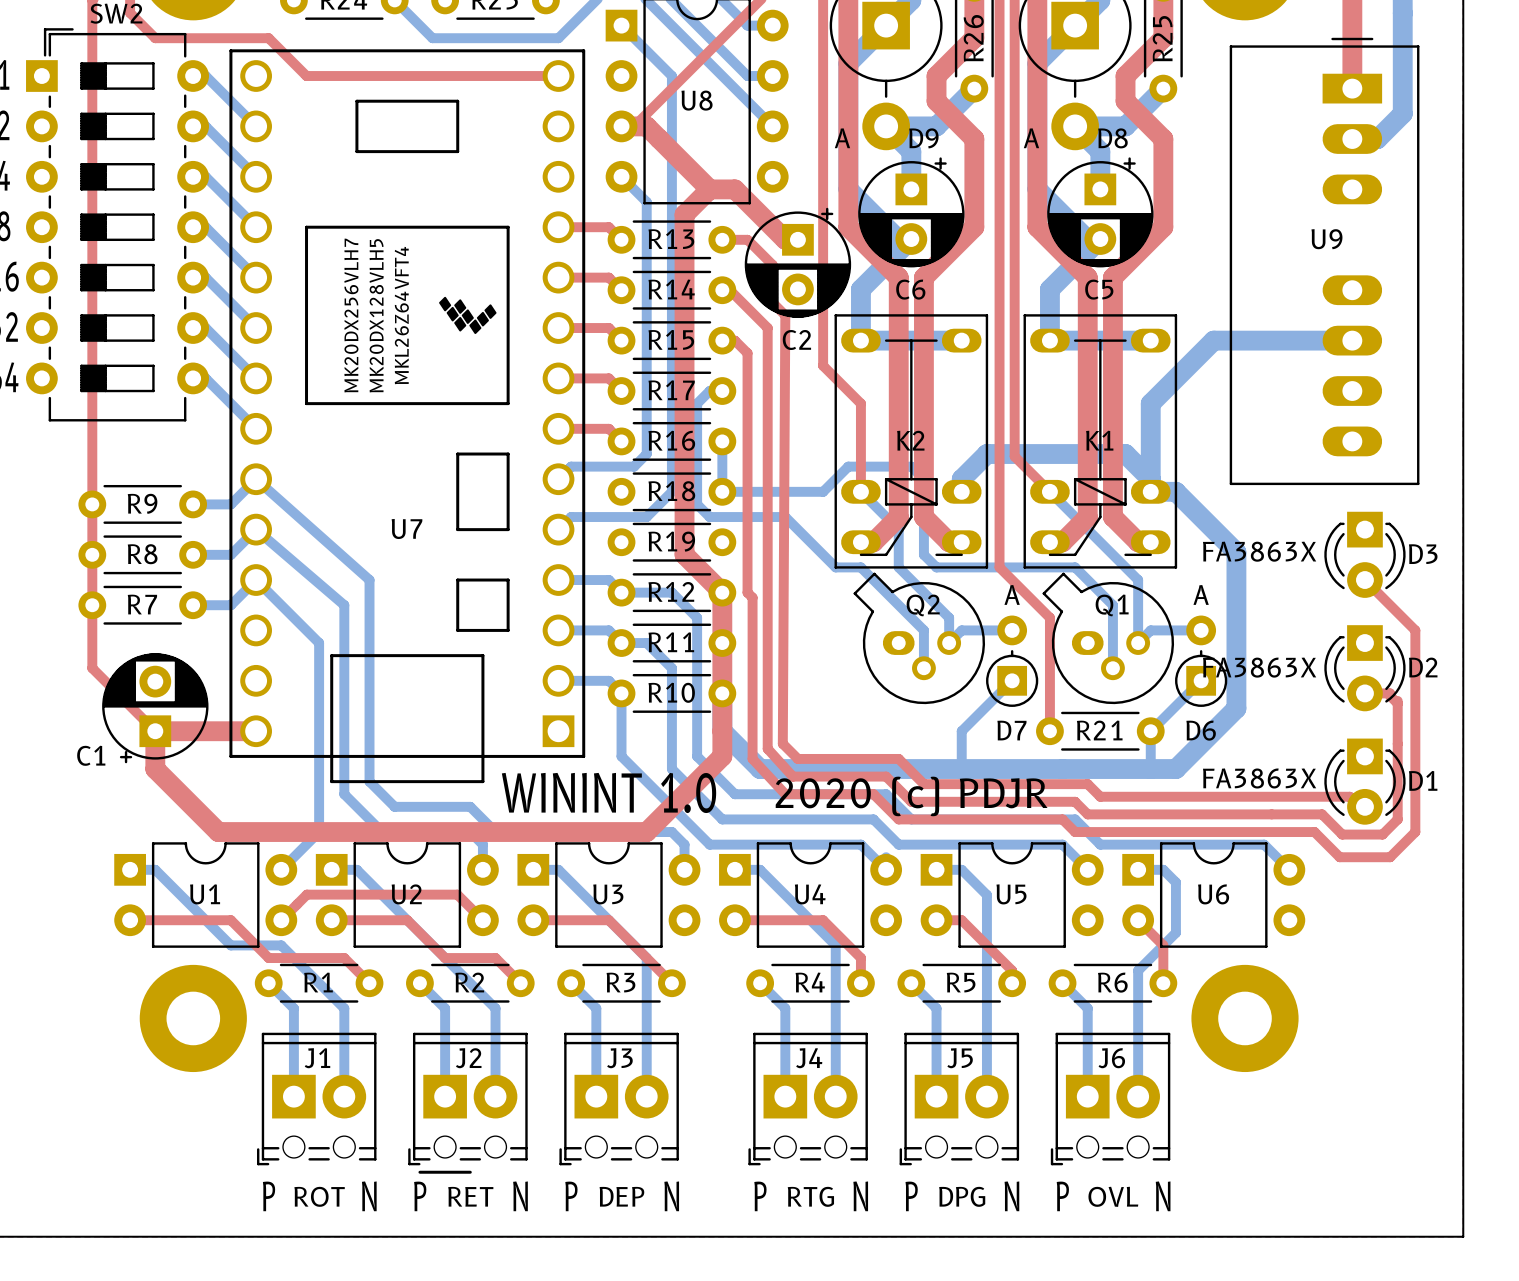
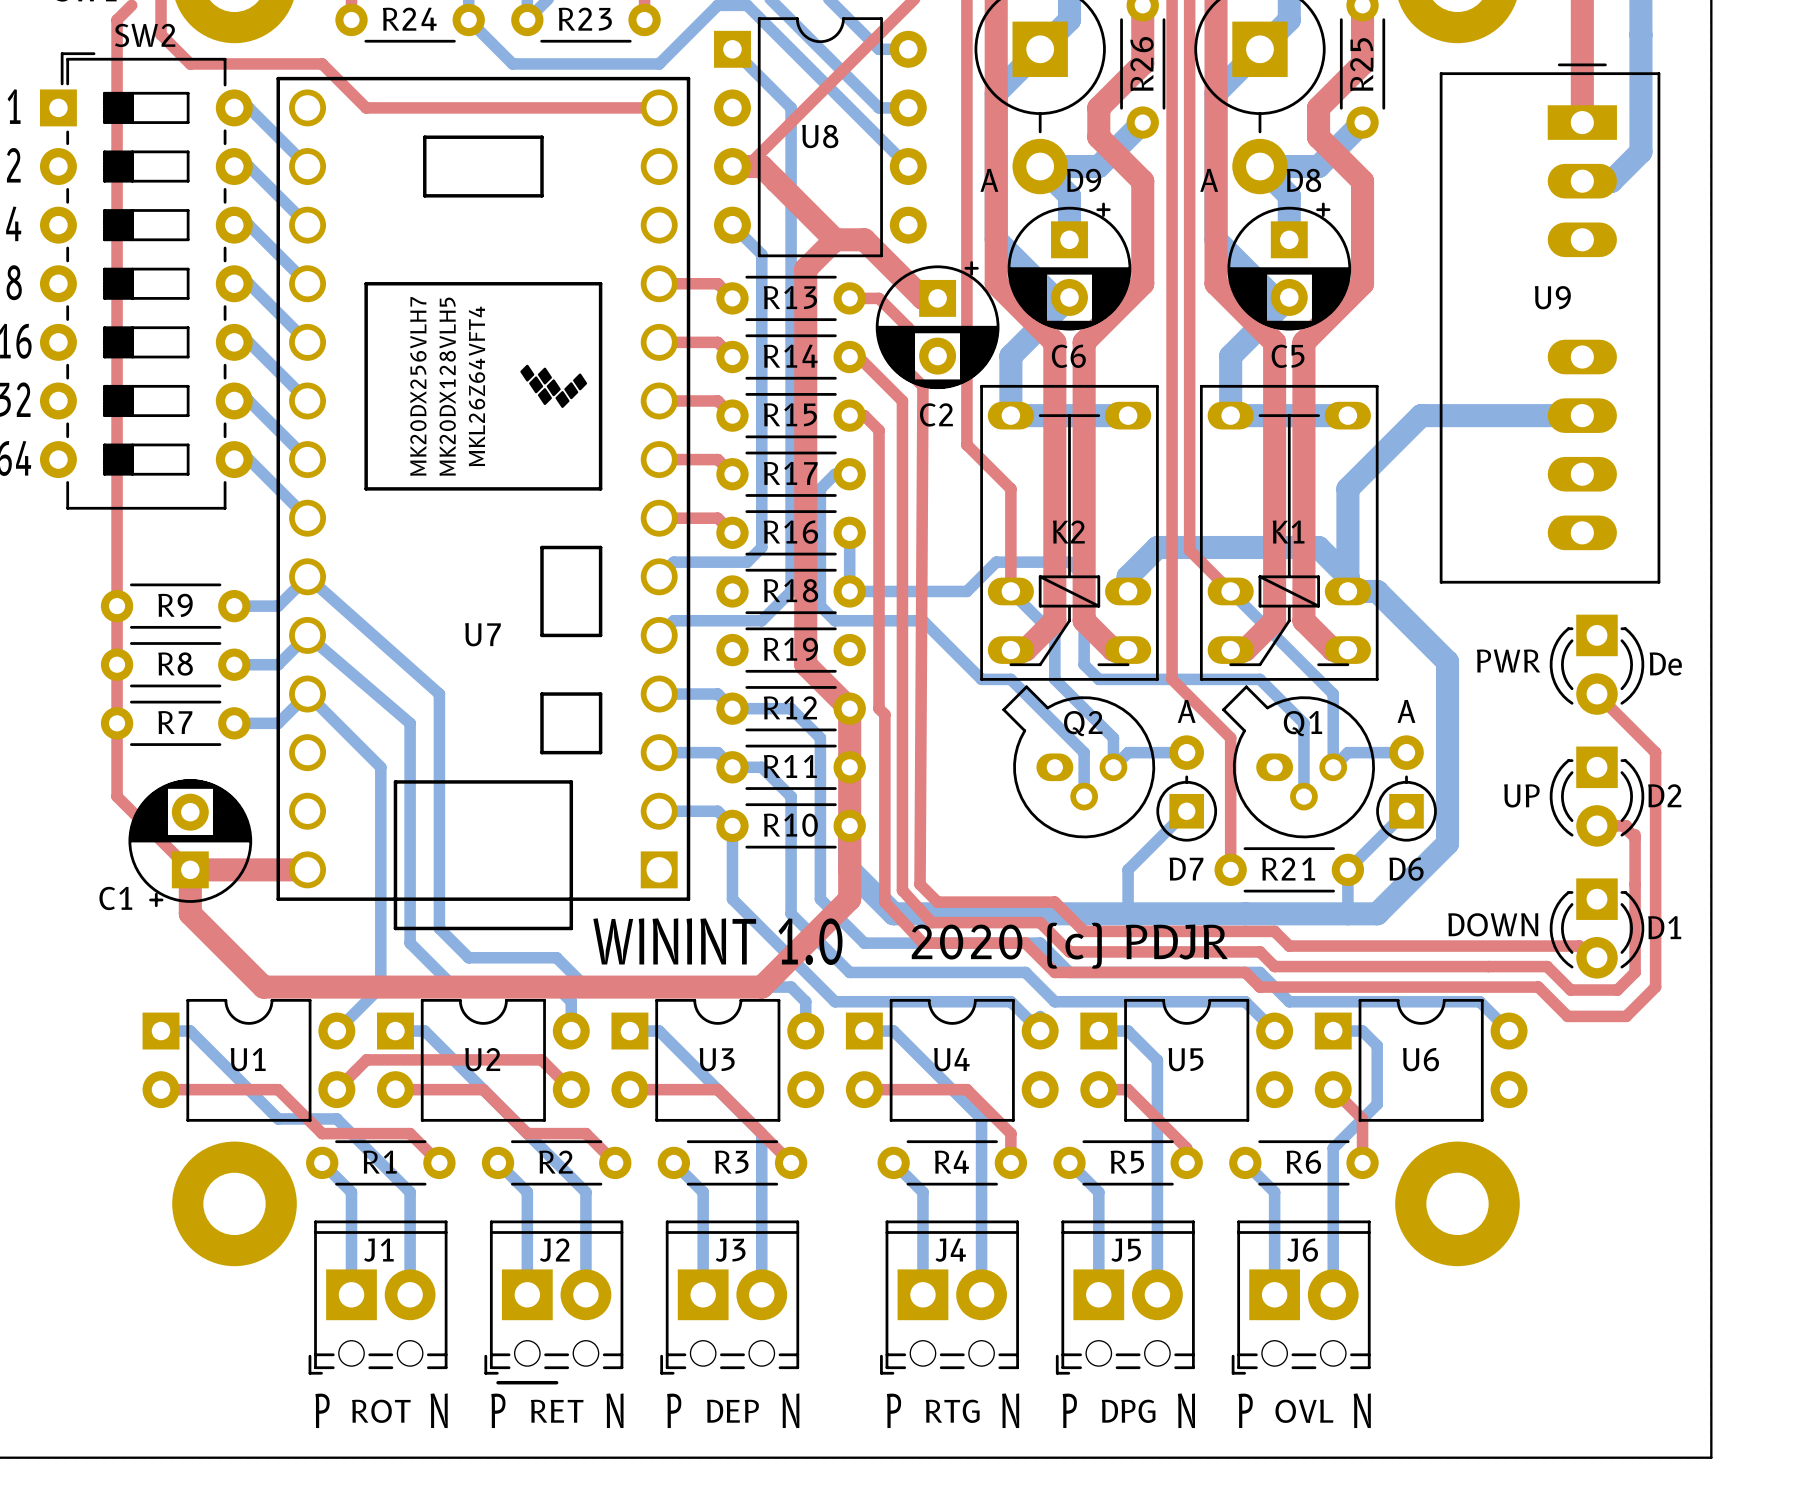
D3 value: FA3863X (1259, 551) -> PWR (1508, 660)
D3 name: D3 (1423, 554) -> De (1665, 664)
D2 value: FA3863X (1259, 667) -> UP (1521, 795)
D1 value: FA3863X (1259, 778) -> DOWN (1493, 924)

